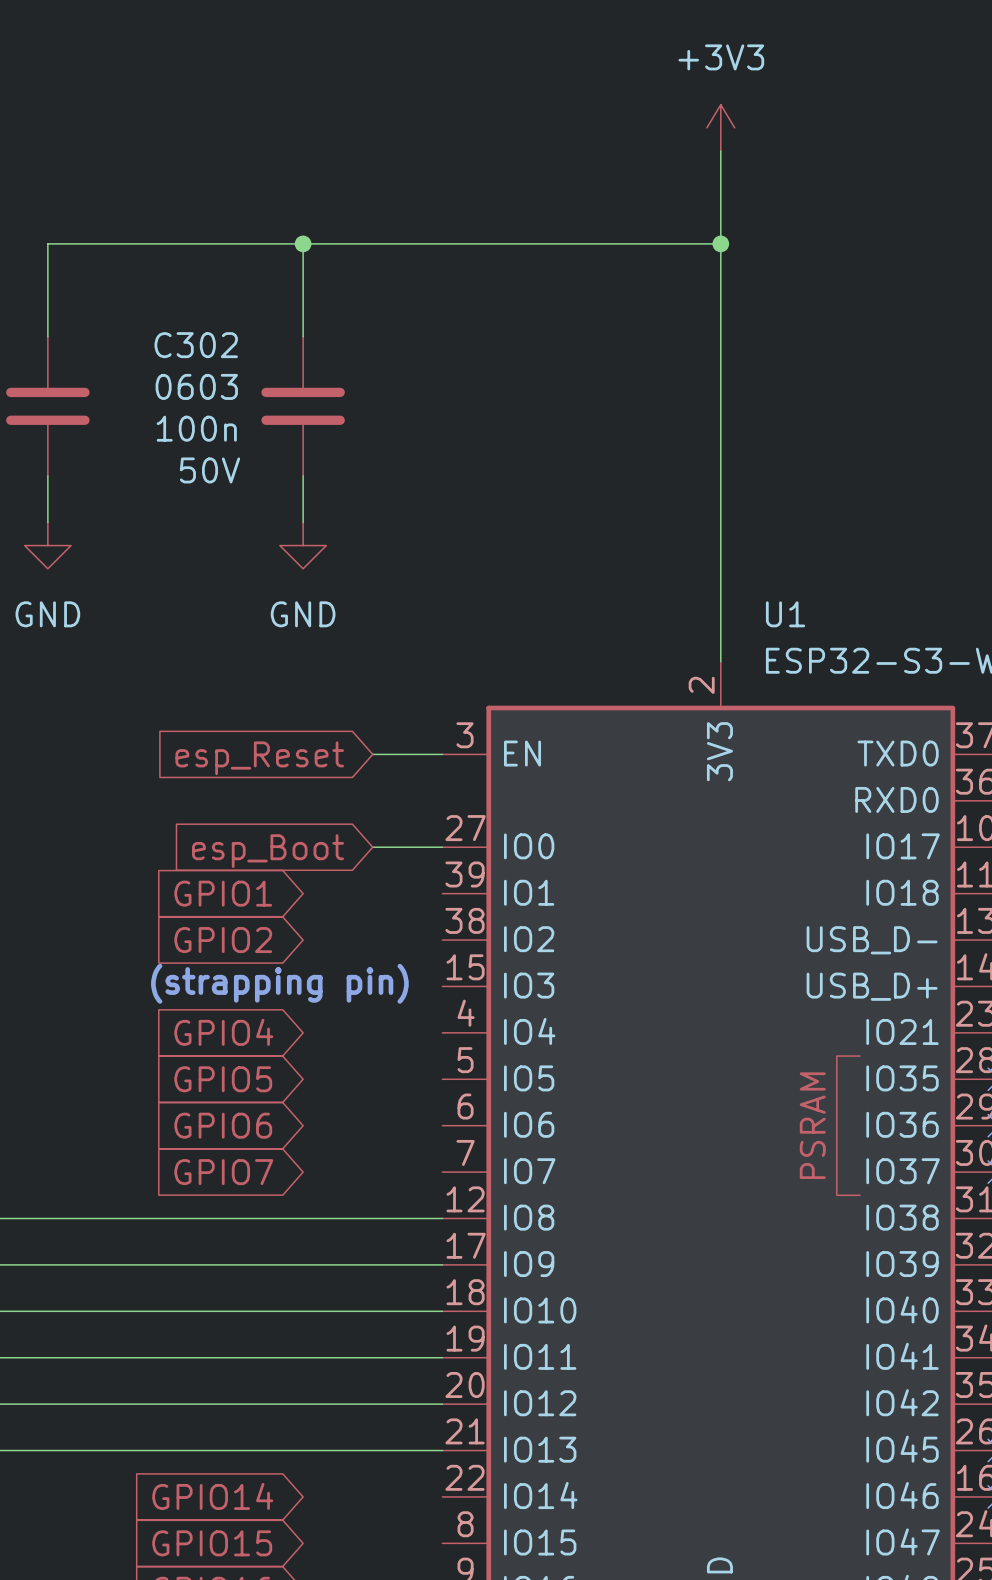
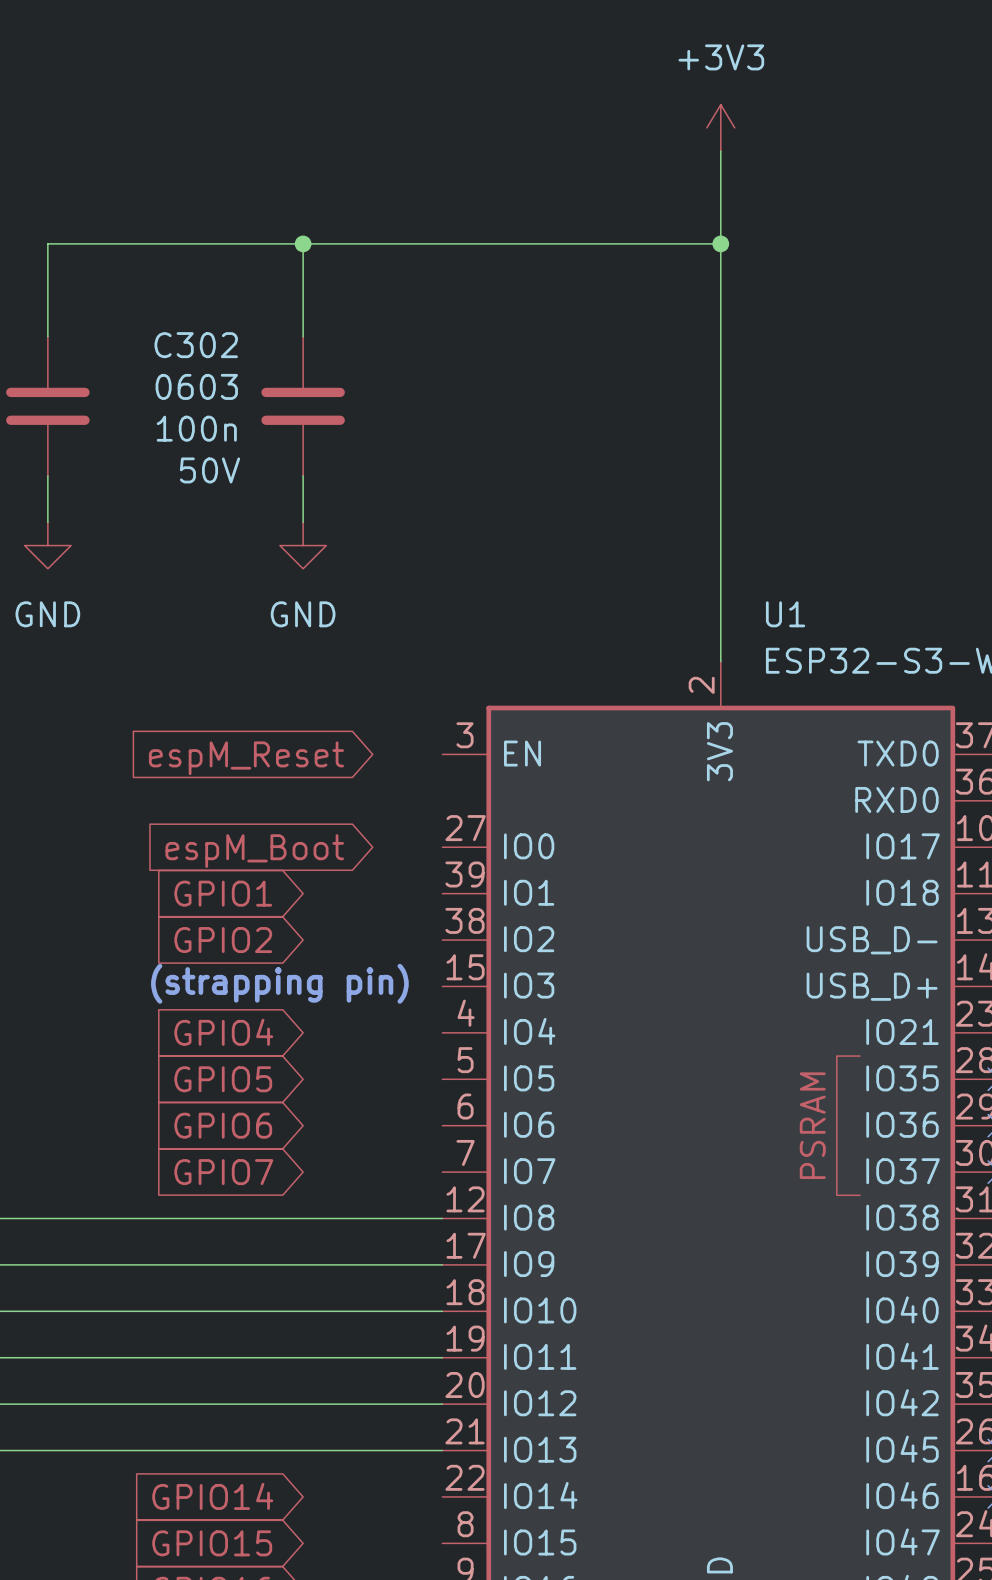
wire: (372, 754) (442, 754) -> none
global label: esp_Reset (259, 758) -> espM_Reset (246, 758)
wire: (372, 847) (442, 847) -> none
global label: esp_Boot (268, 851) -> espM_Boot (254, 851)

